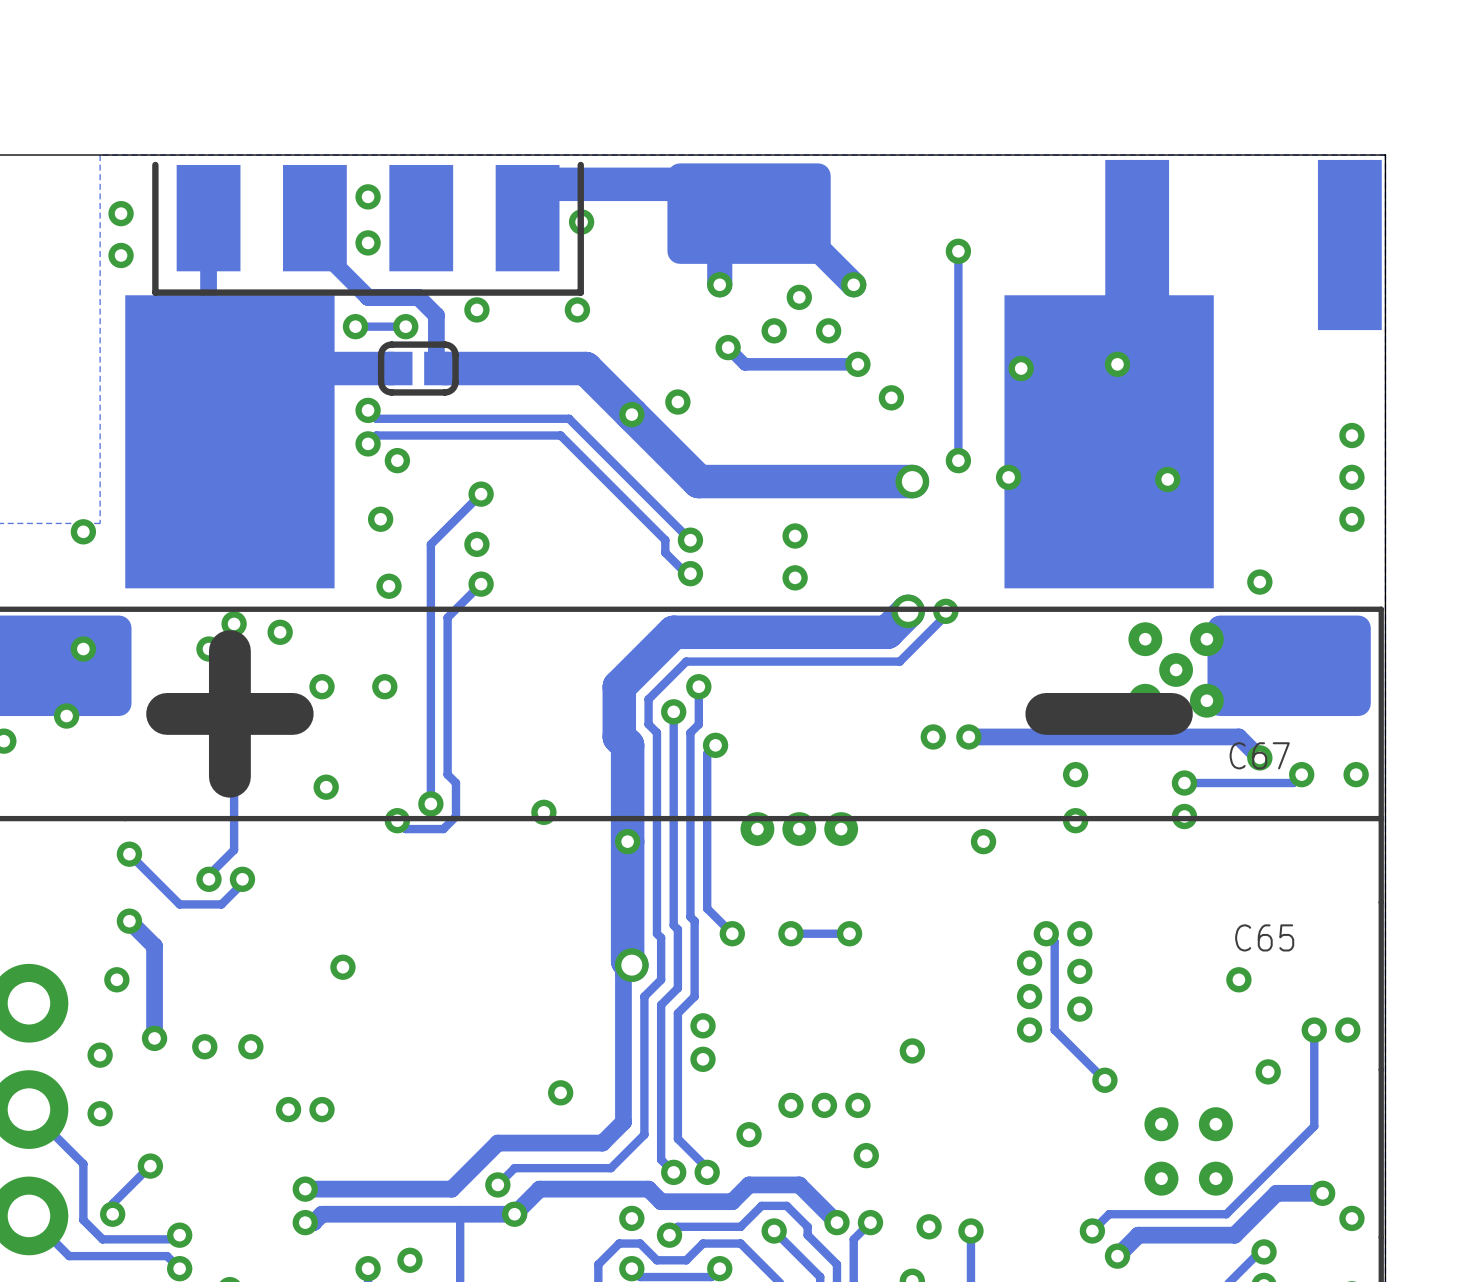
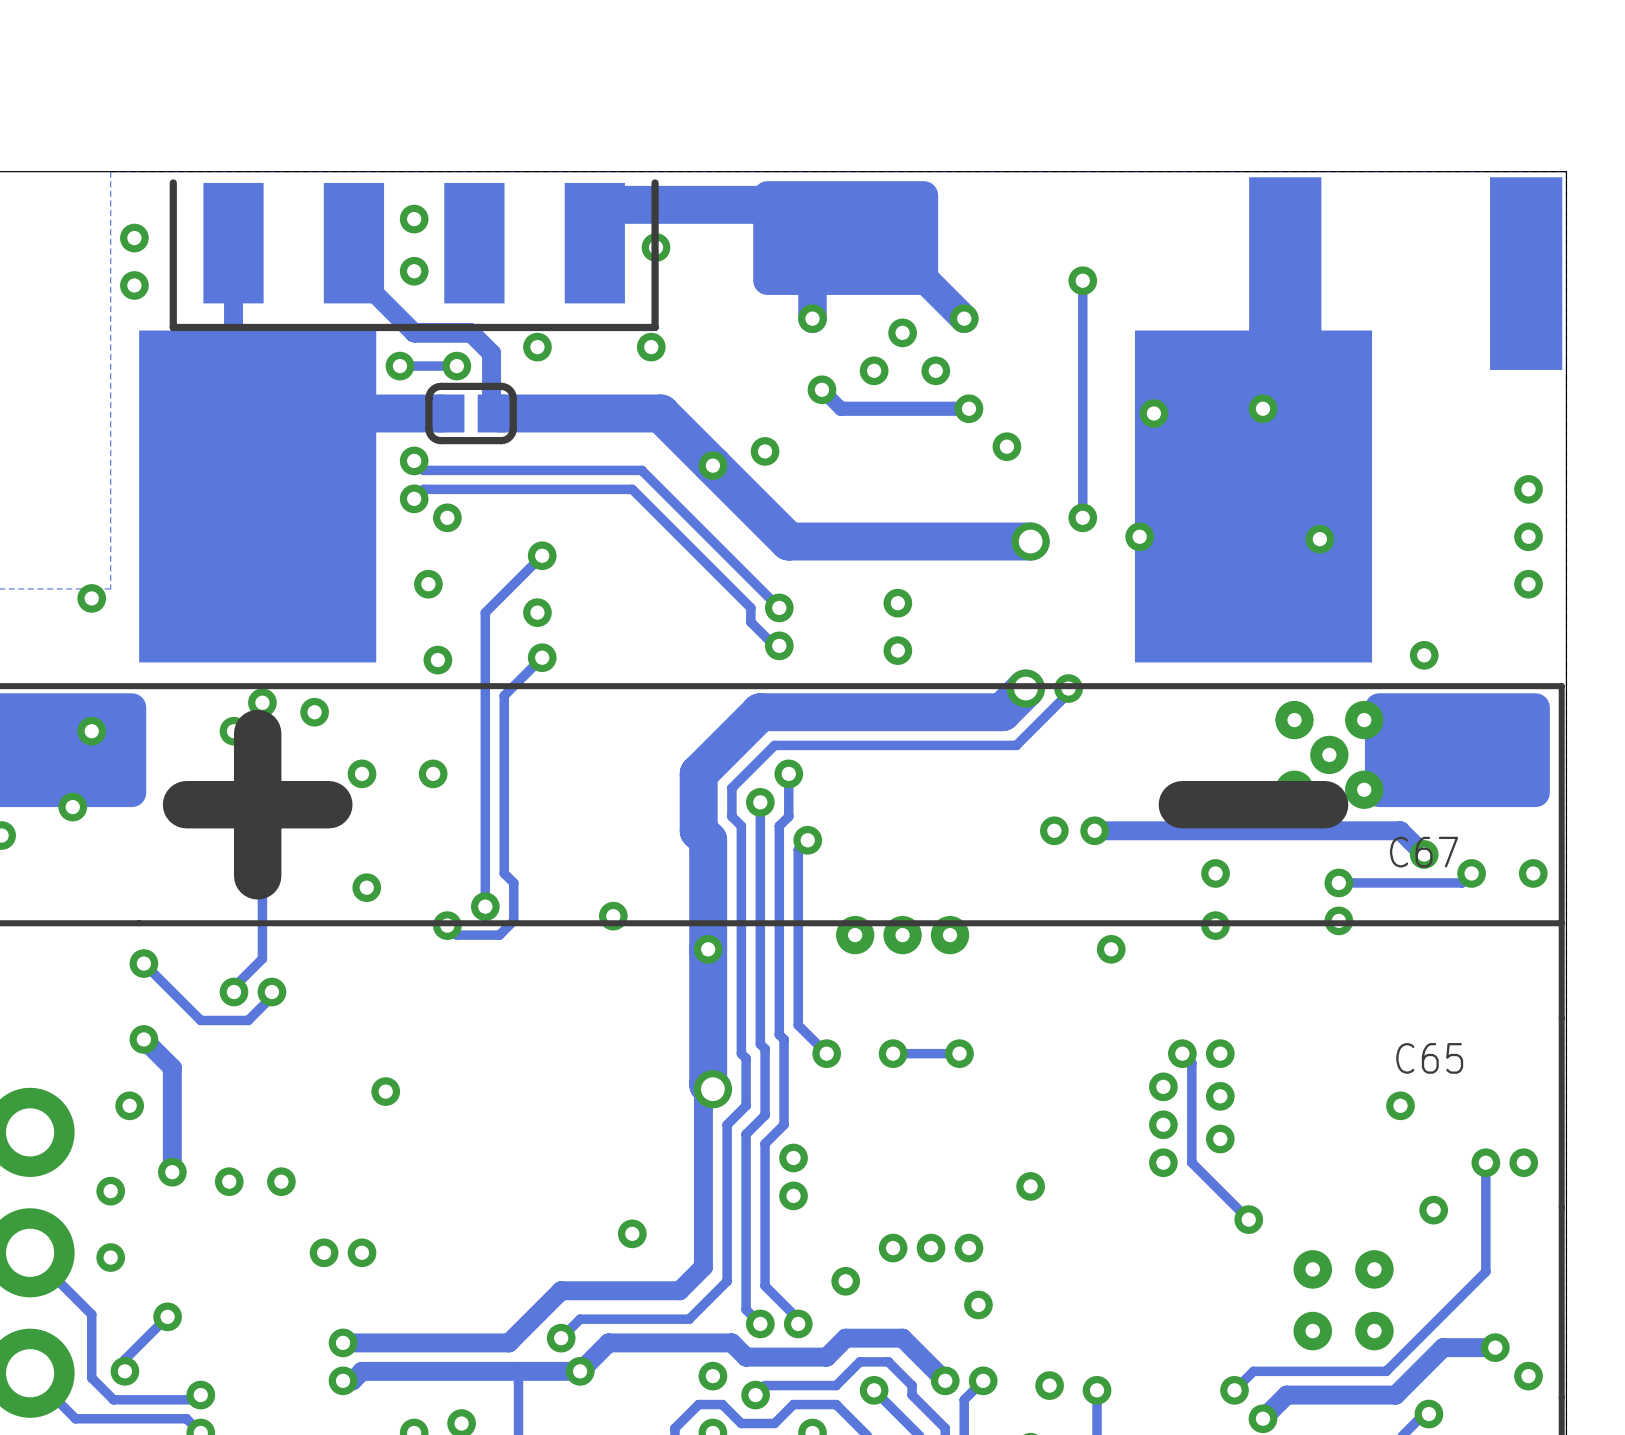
part footprint: [152, 161, 584, 296] -> [169, 179, 659, 332]

